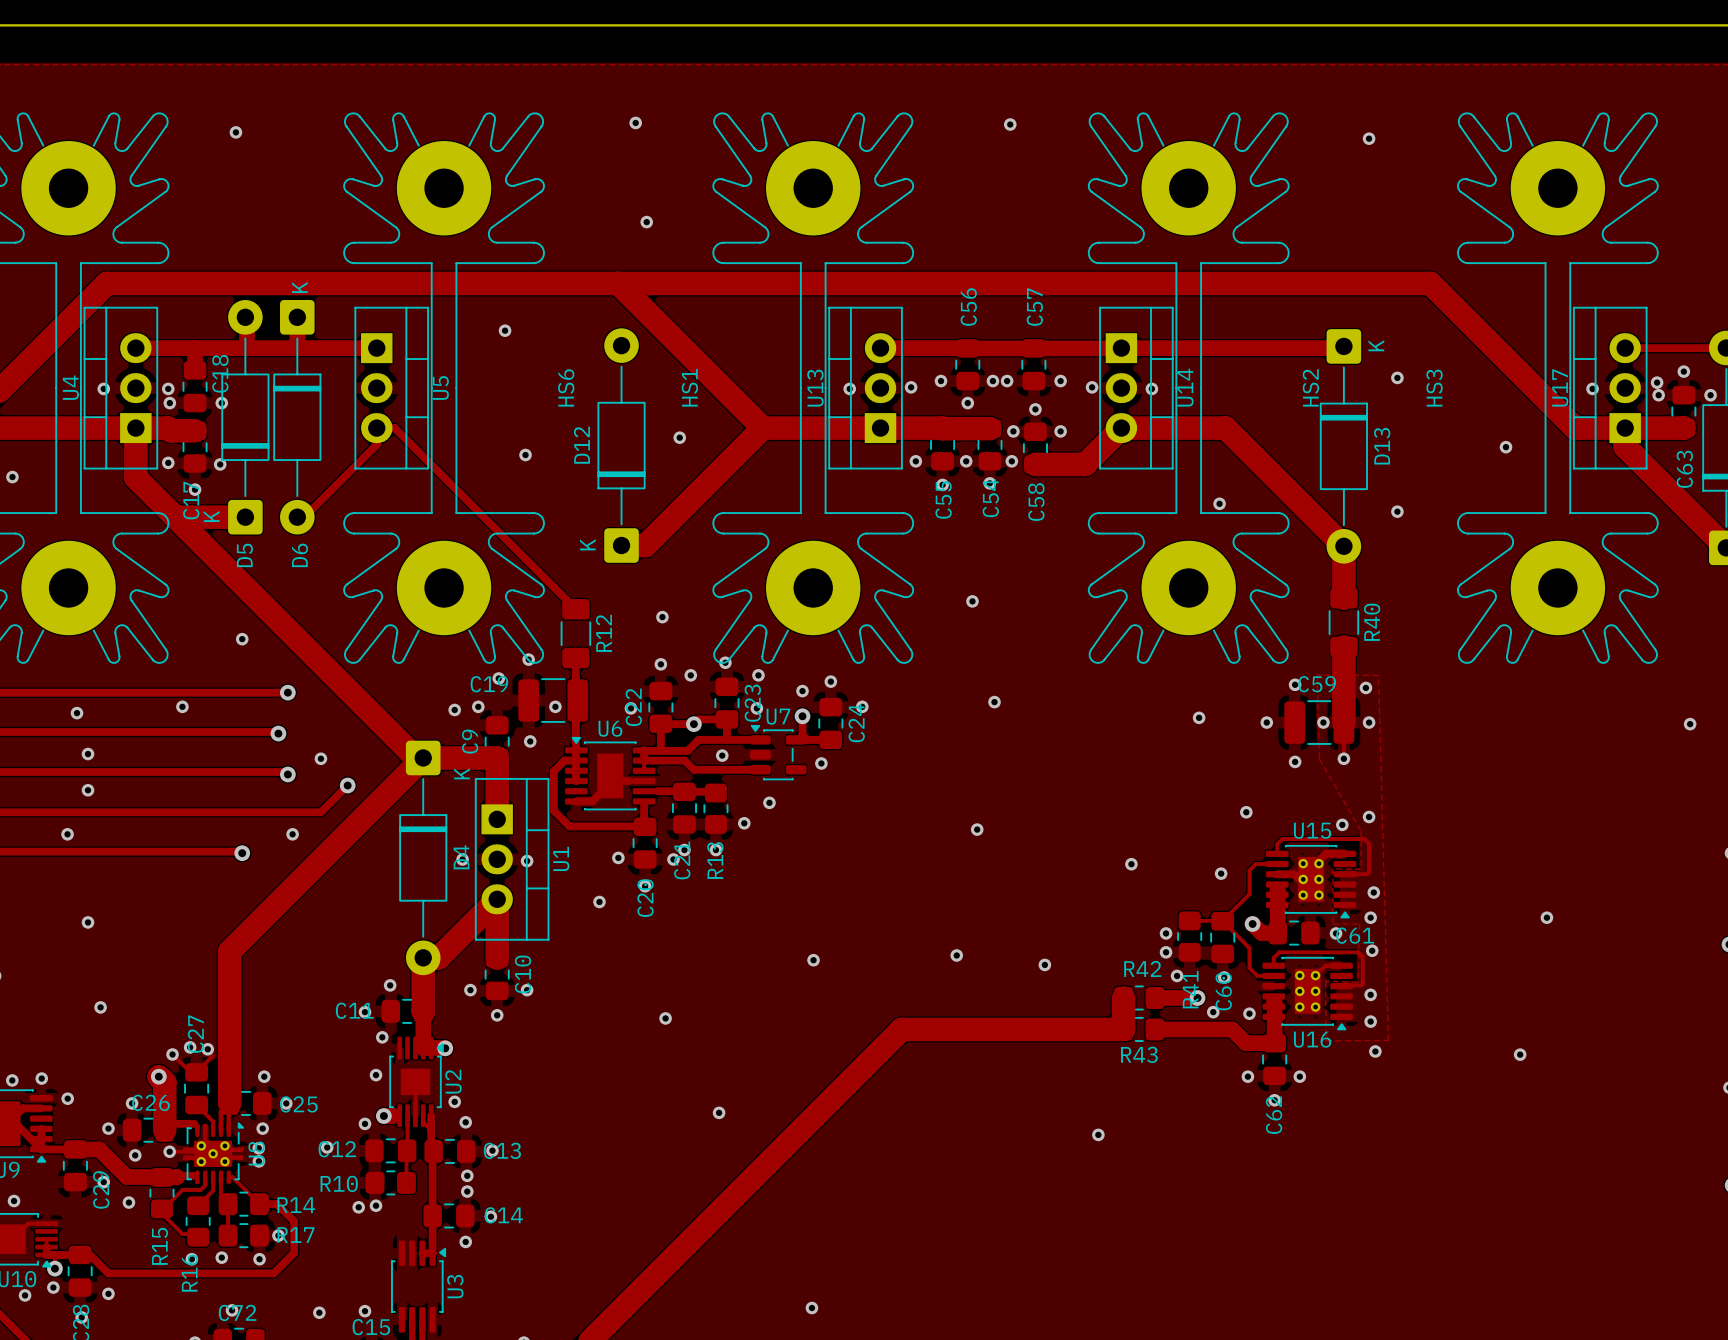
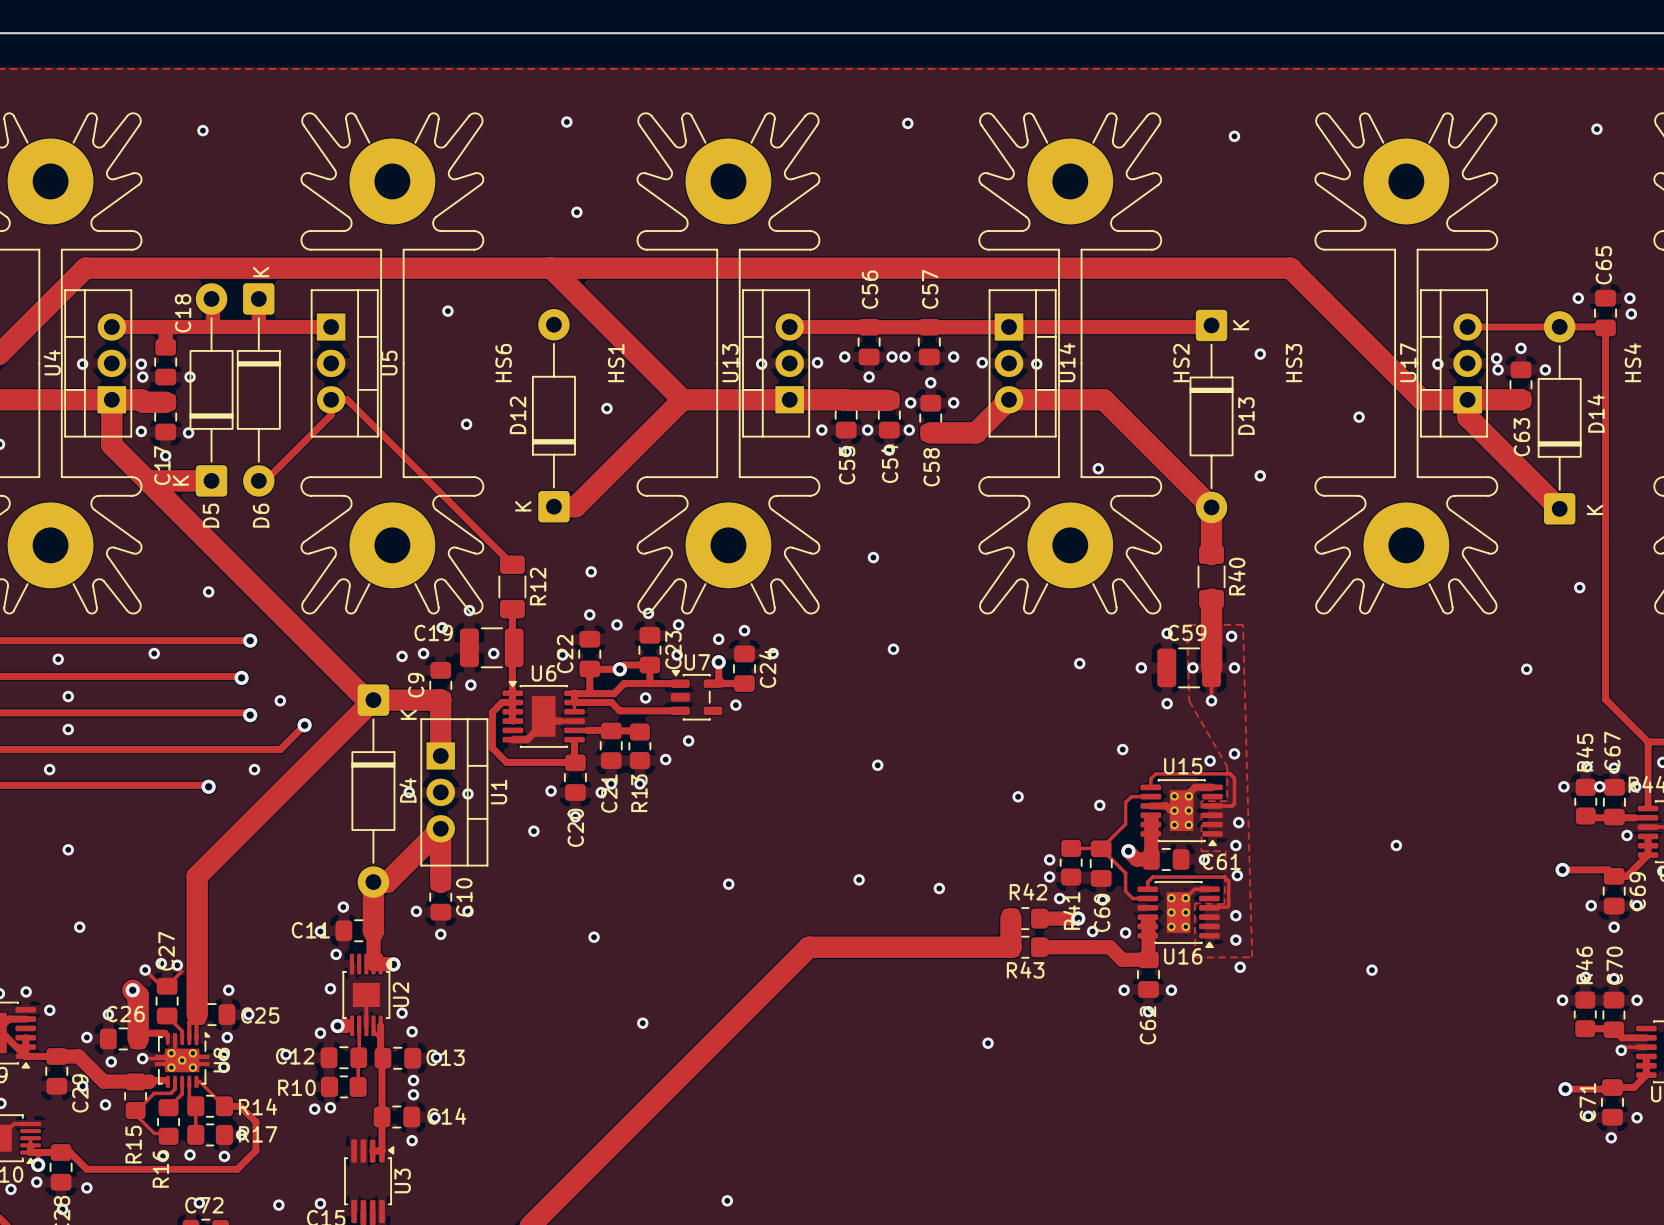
C18 name position: C18 (220, 373) -> C18 (183, 313)

